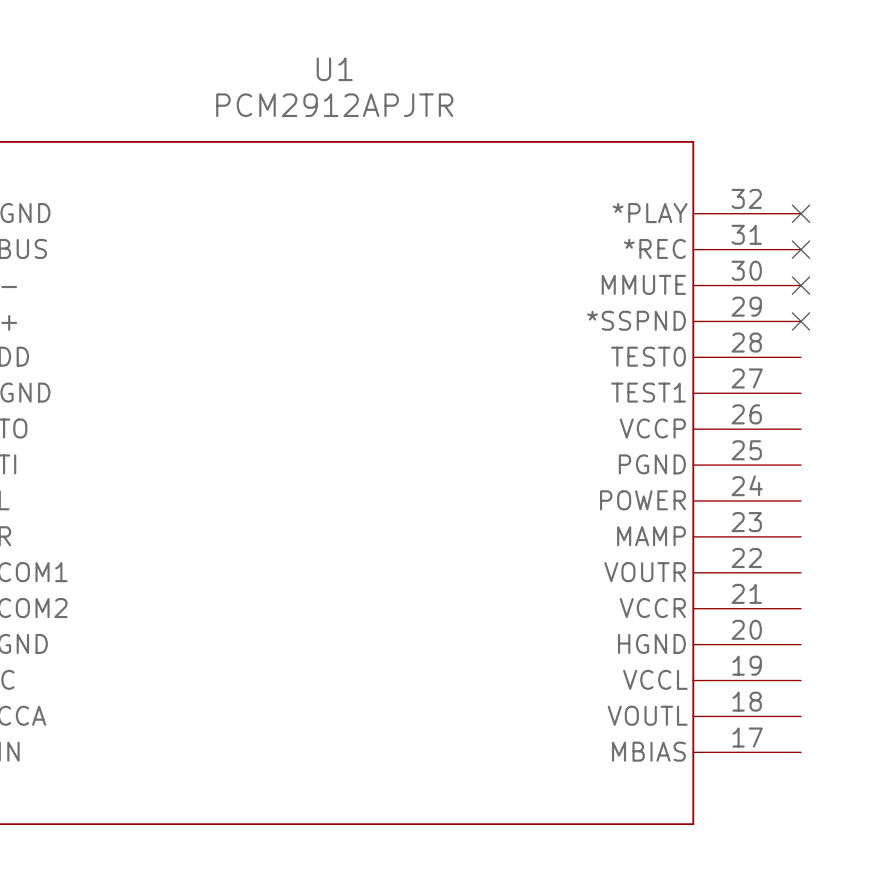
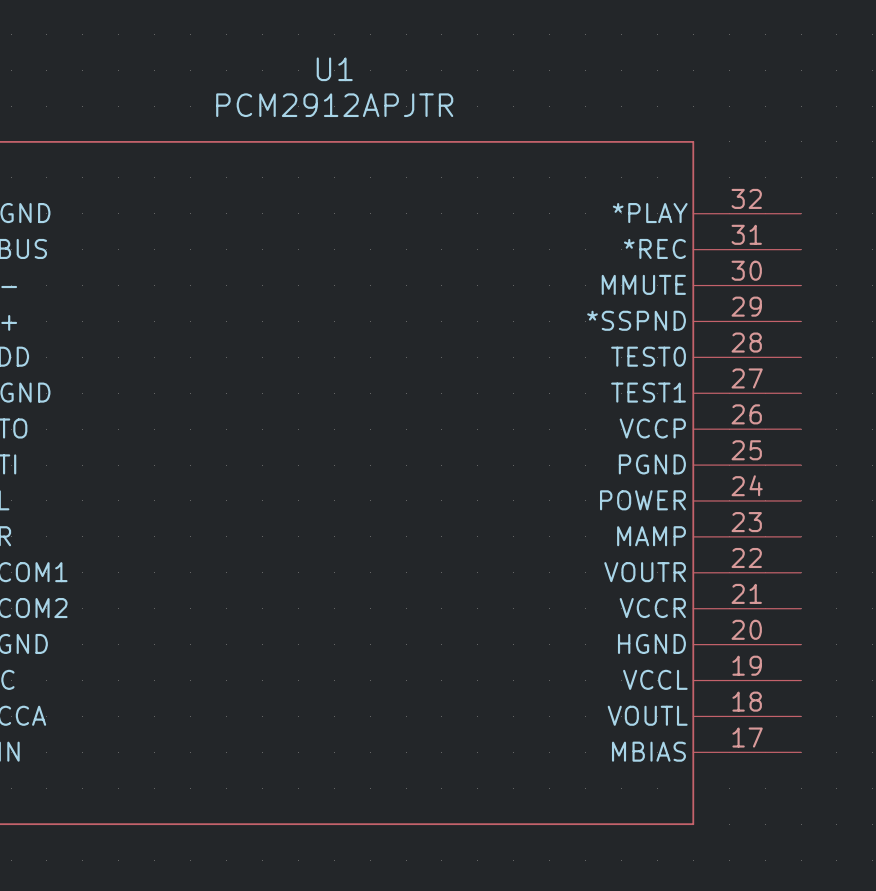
no-connect mark: (801, 213) -> none
no-connect mark: (801, 249) -> none
no-connect mark: (801, 285) -> none
no-connect mark: (801, 321) -> none

